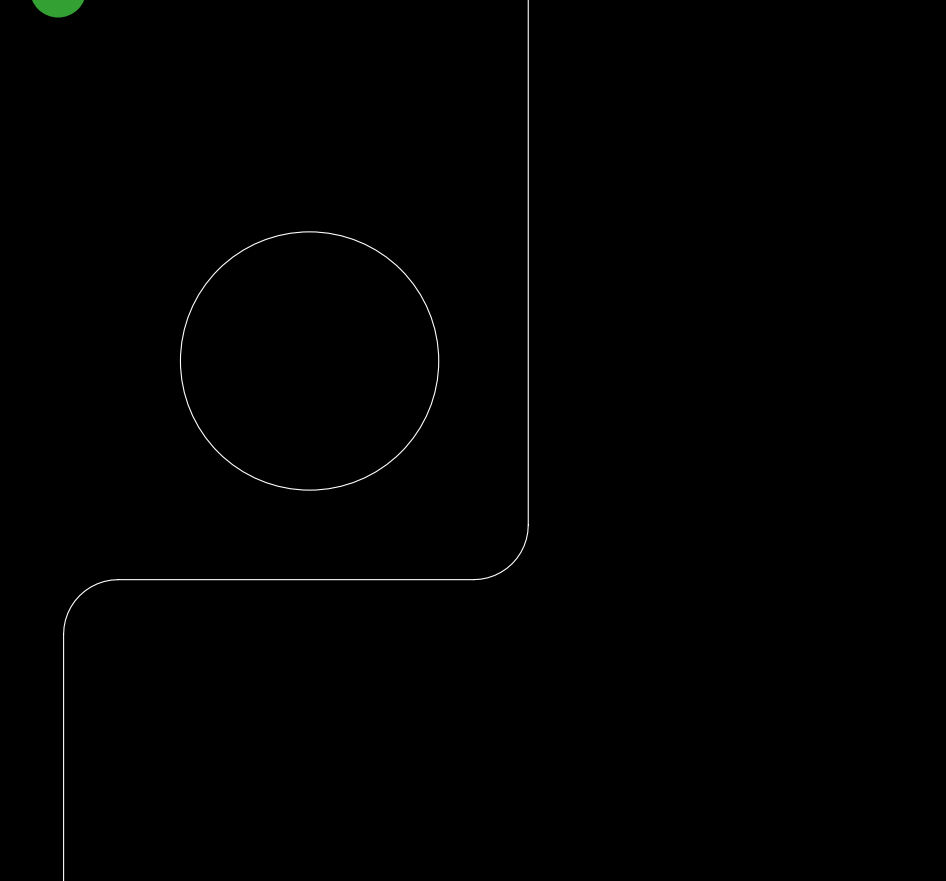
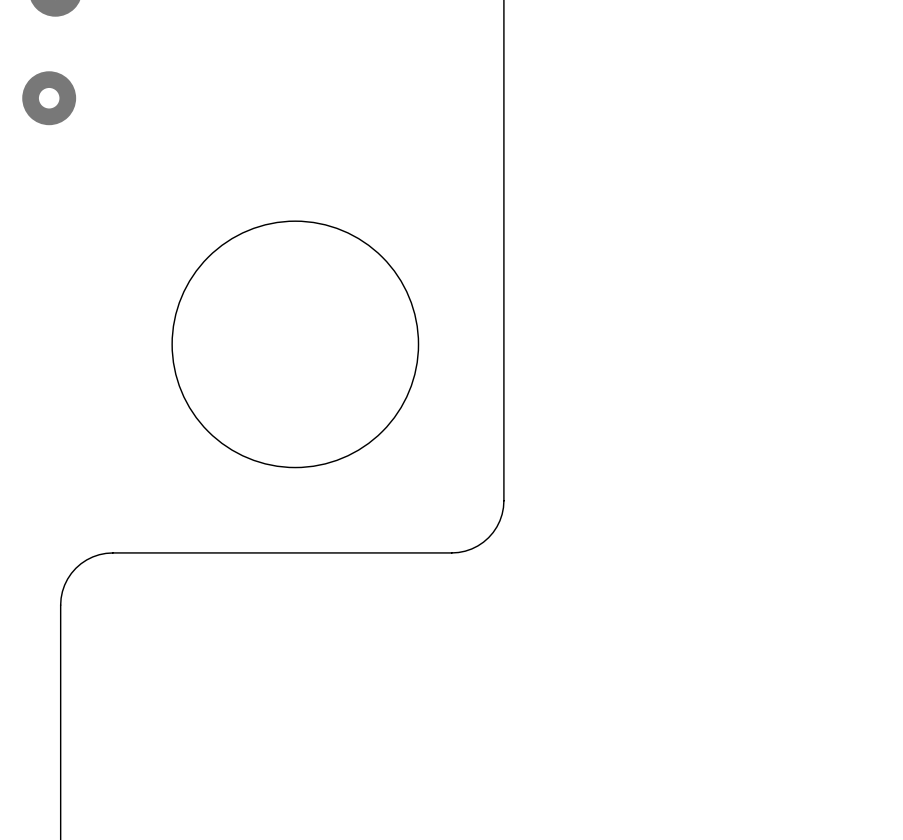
via: none -> (49, 98)

